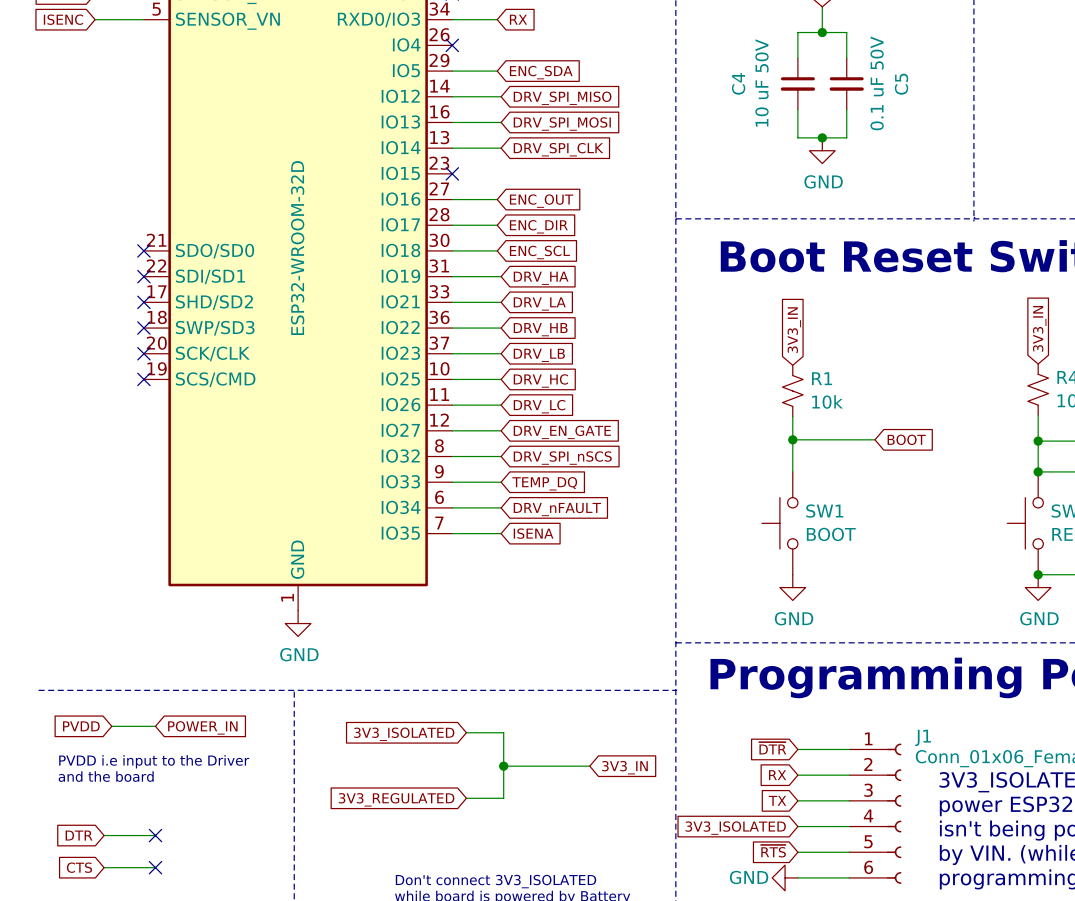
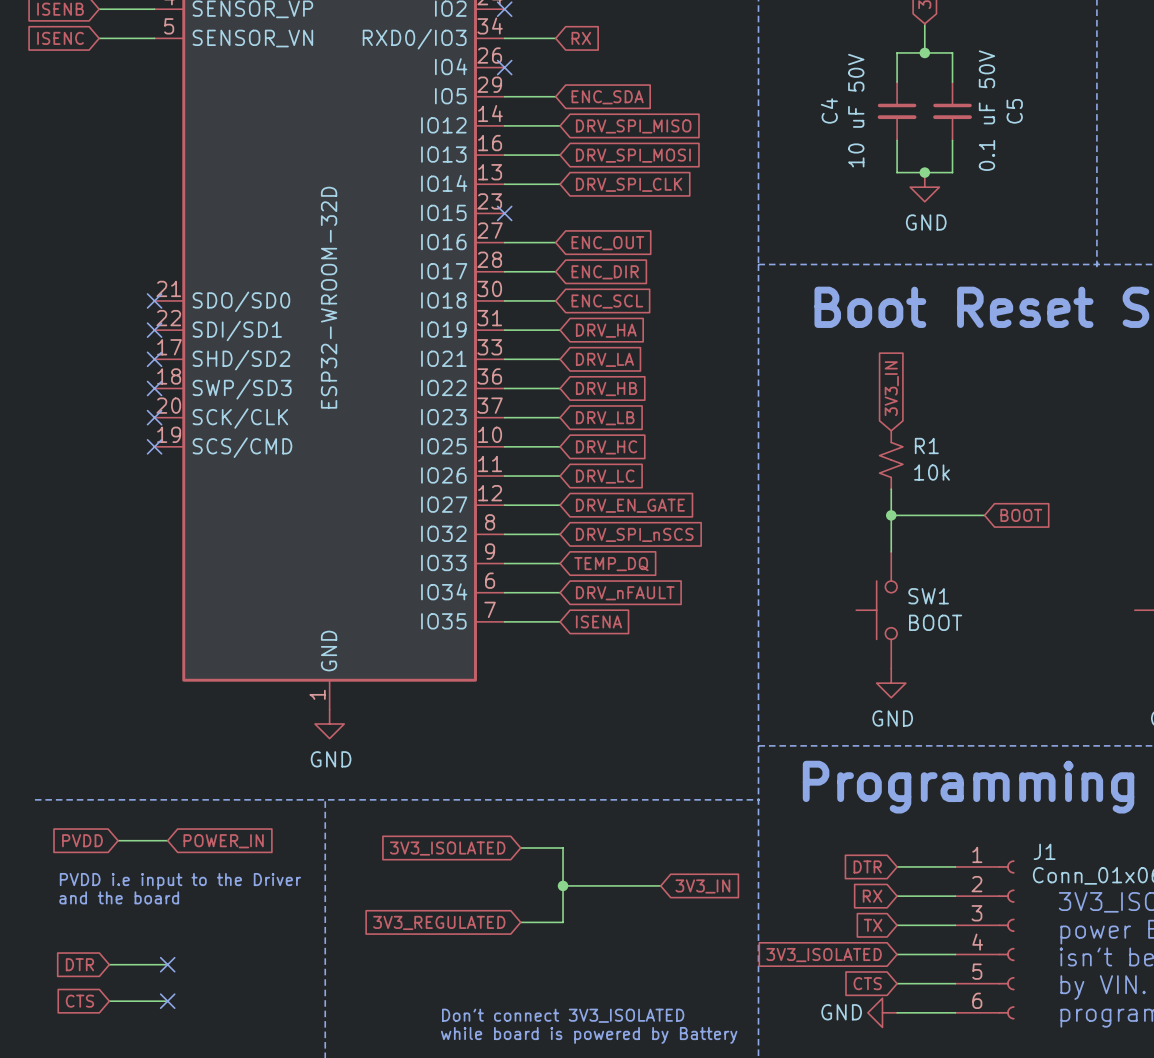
global label: ~{DTR} (772, 748) -> DTR (867, 866)
global label: ~{RTS} (773, 851) -> CTS (867, 983)

